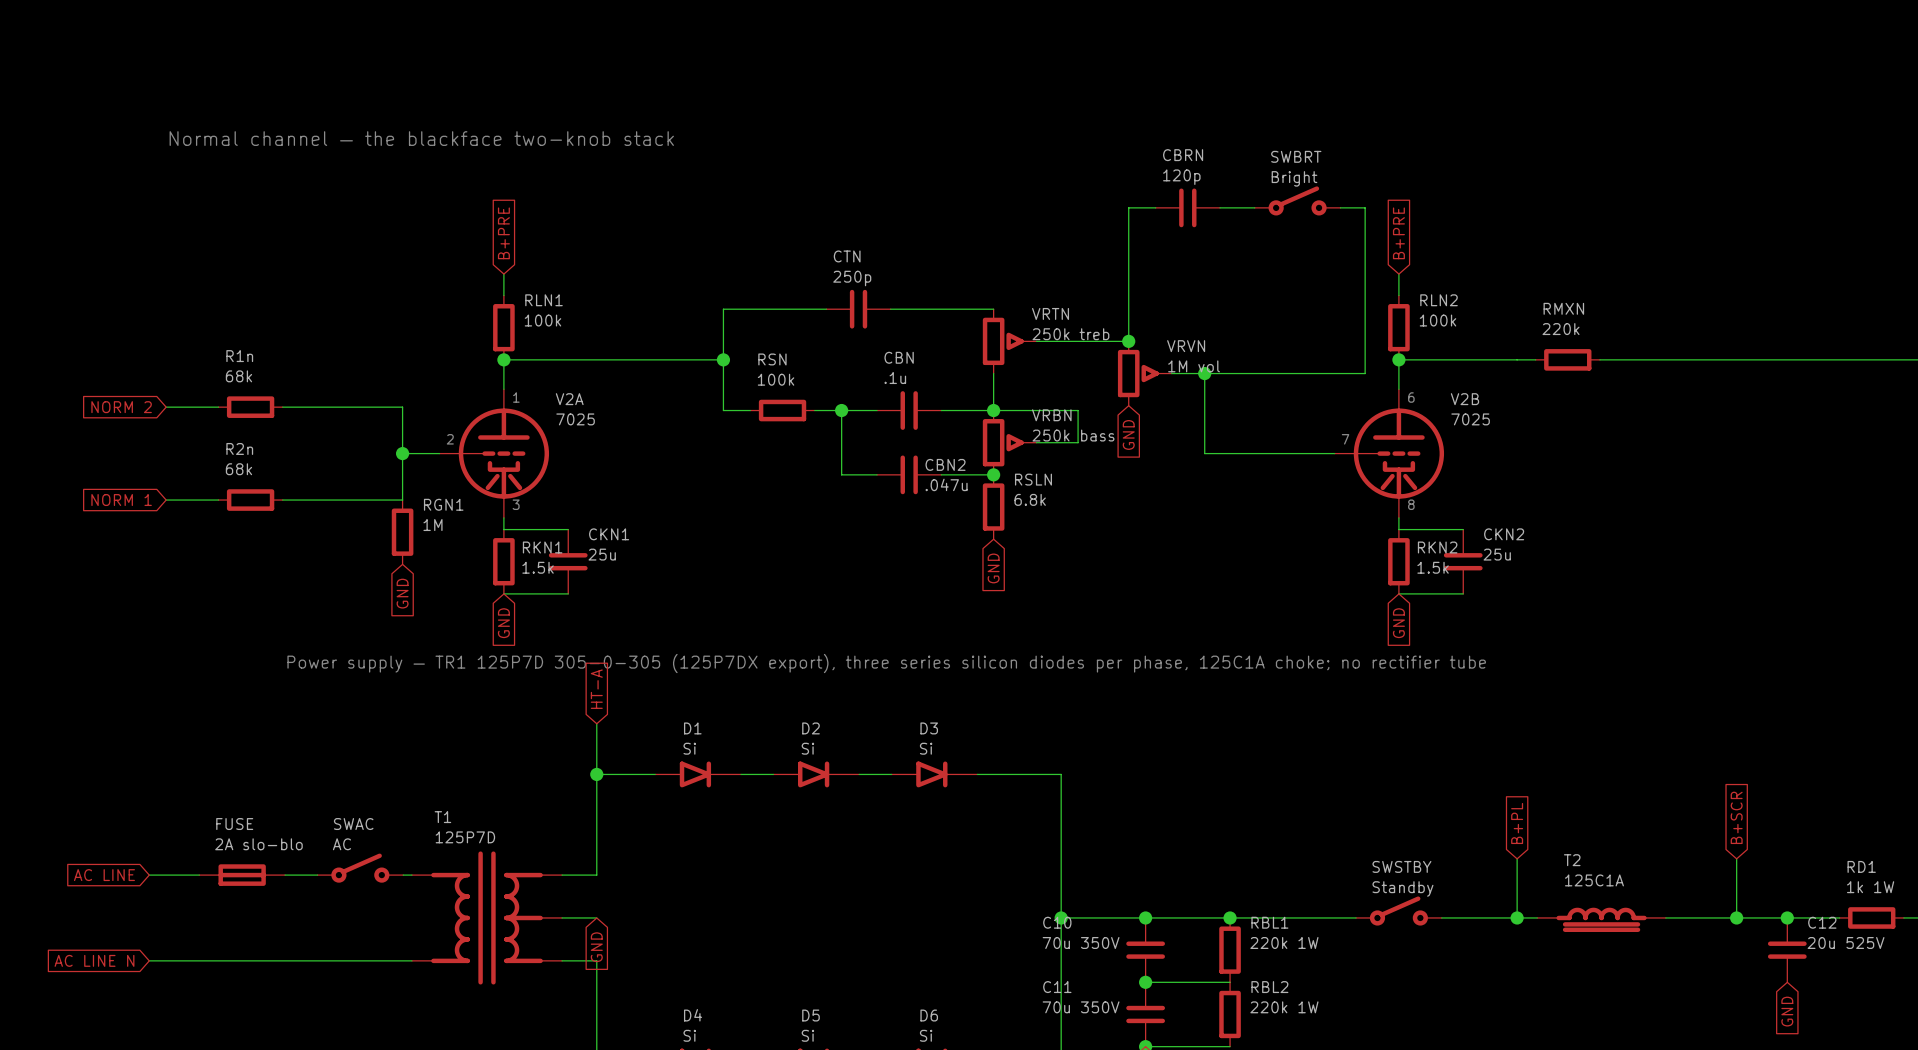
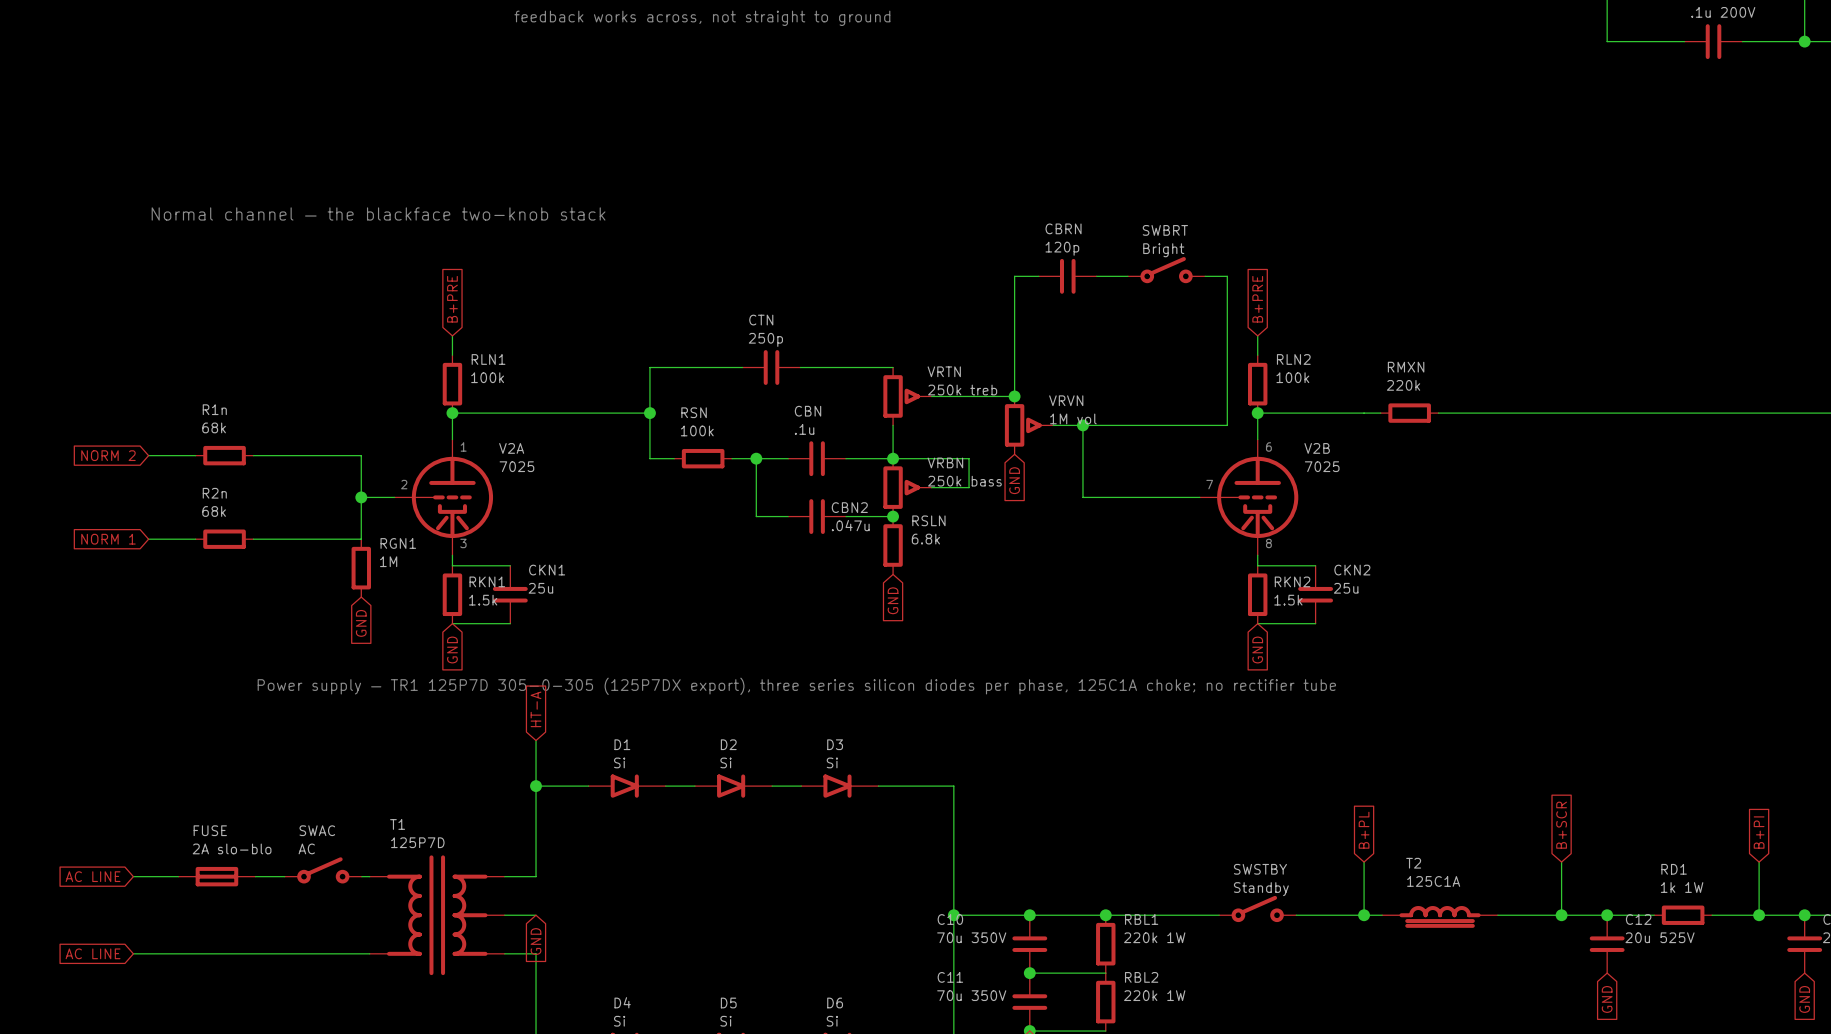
global label: AC LINE N (94, 960) -> AC LINE (93, 953)

